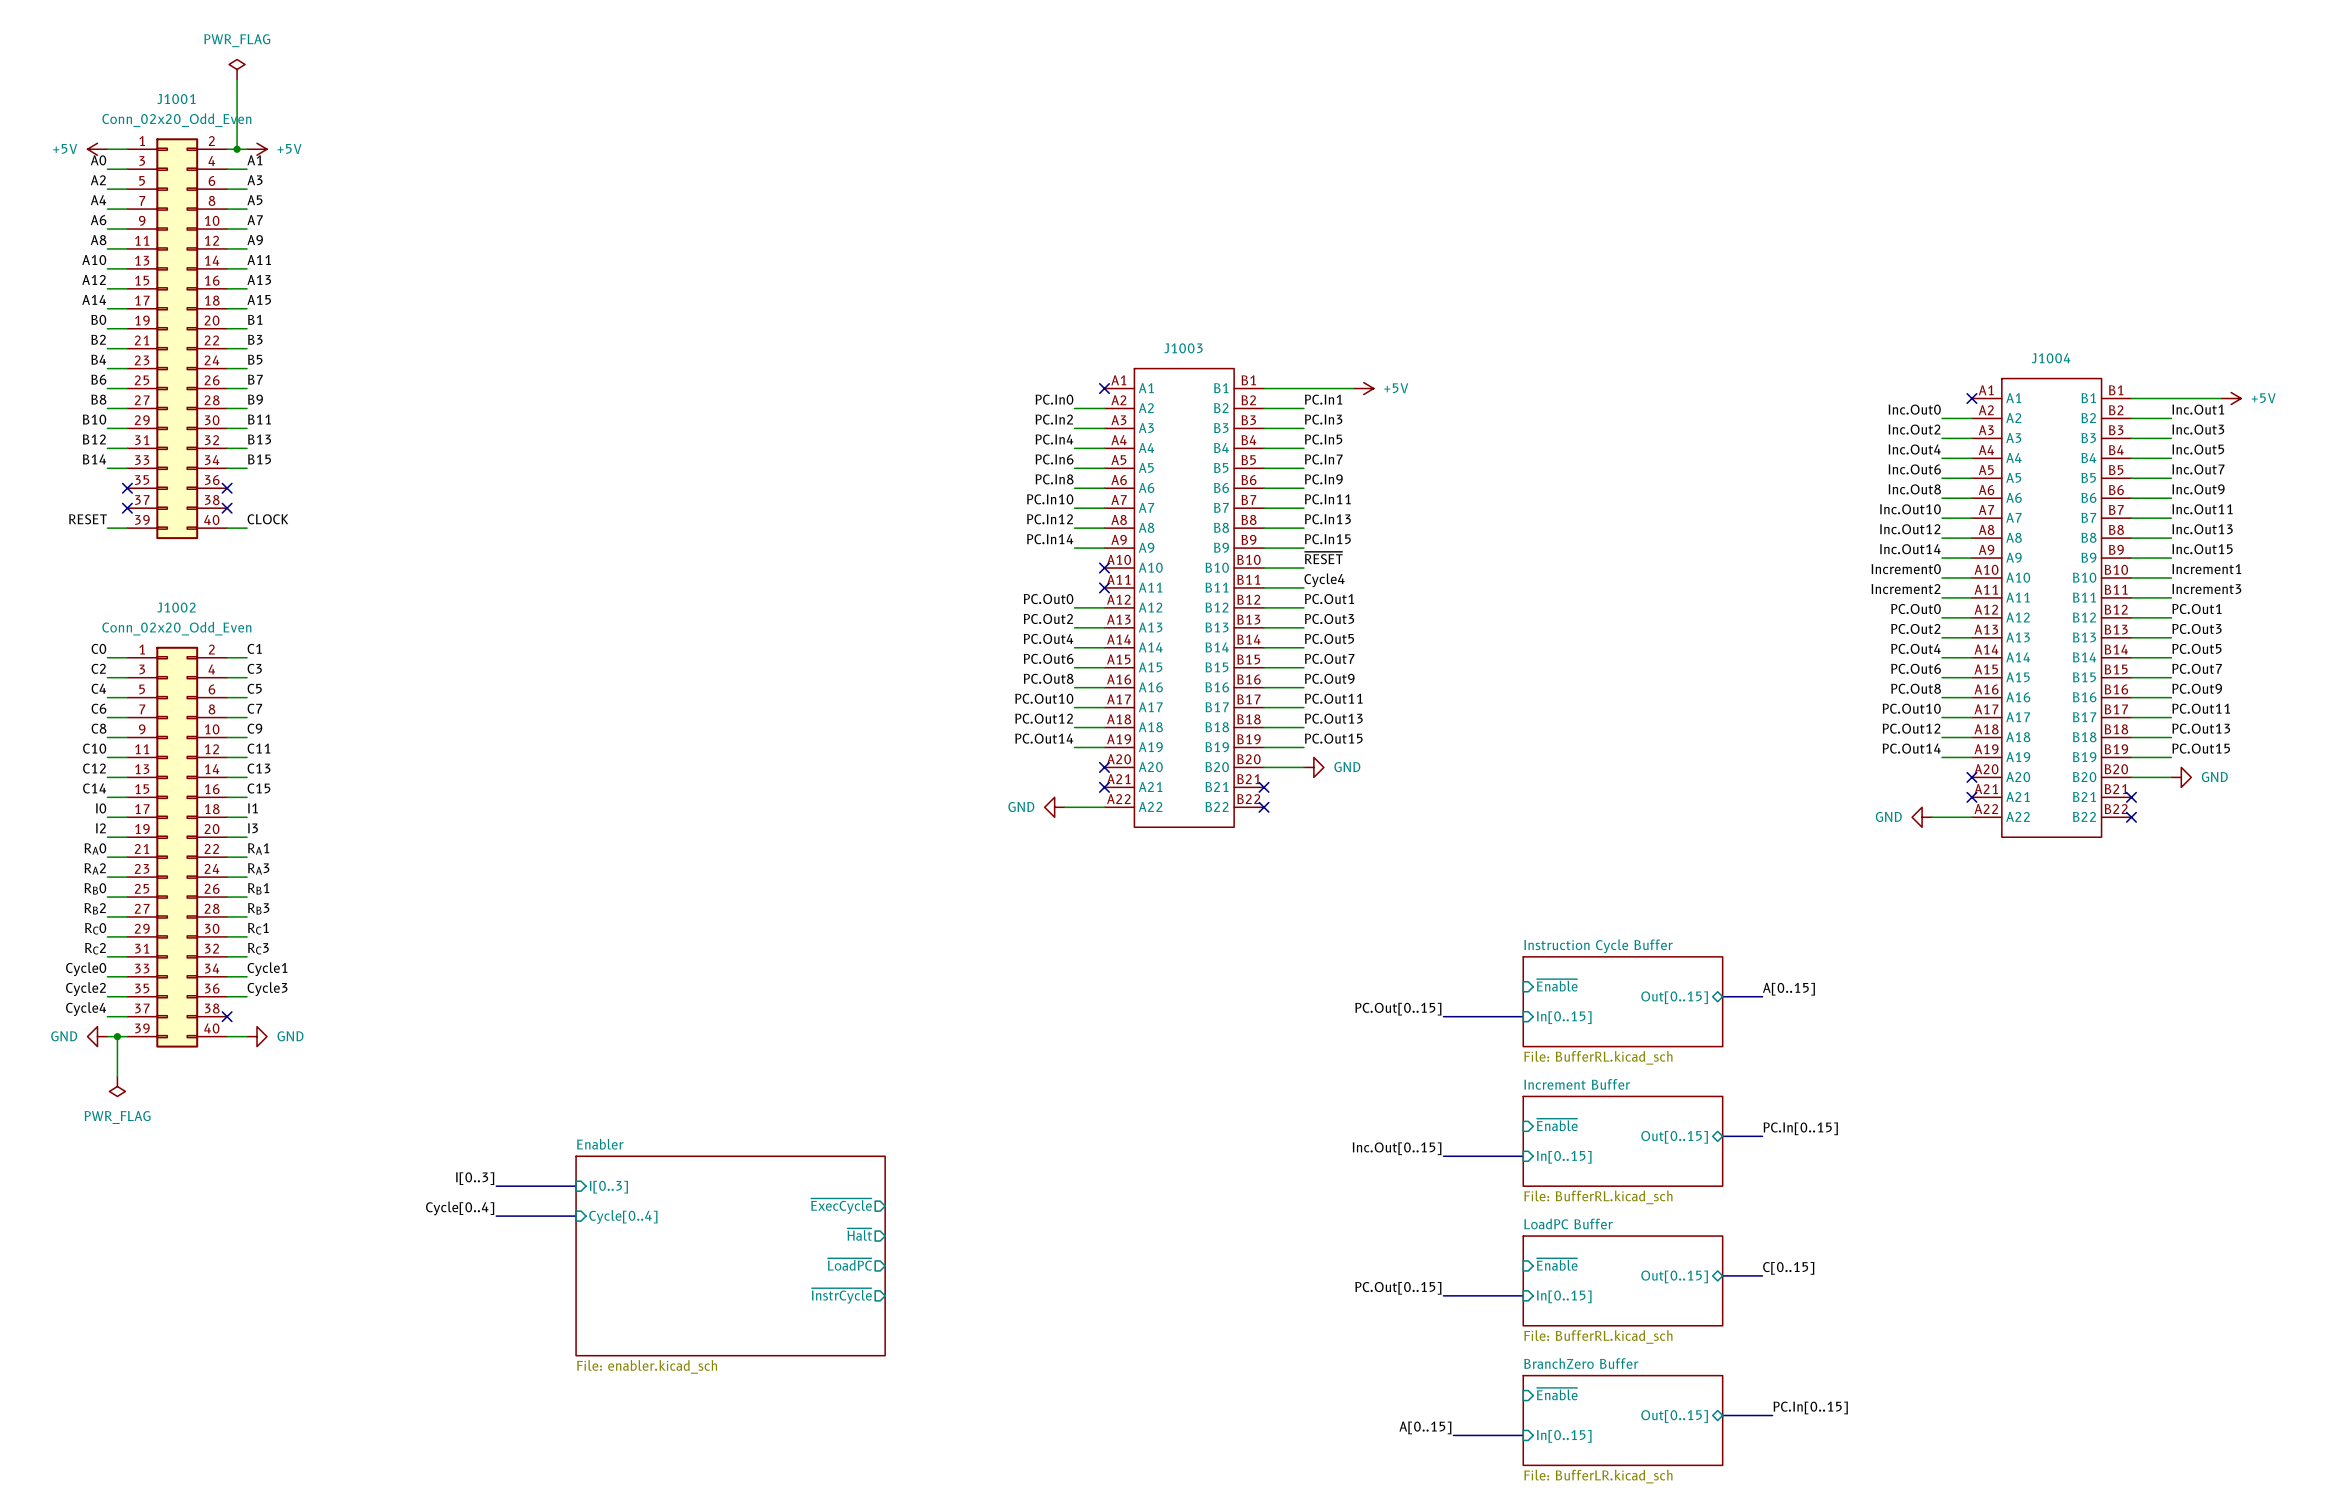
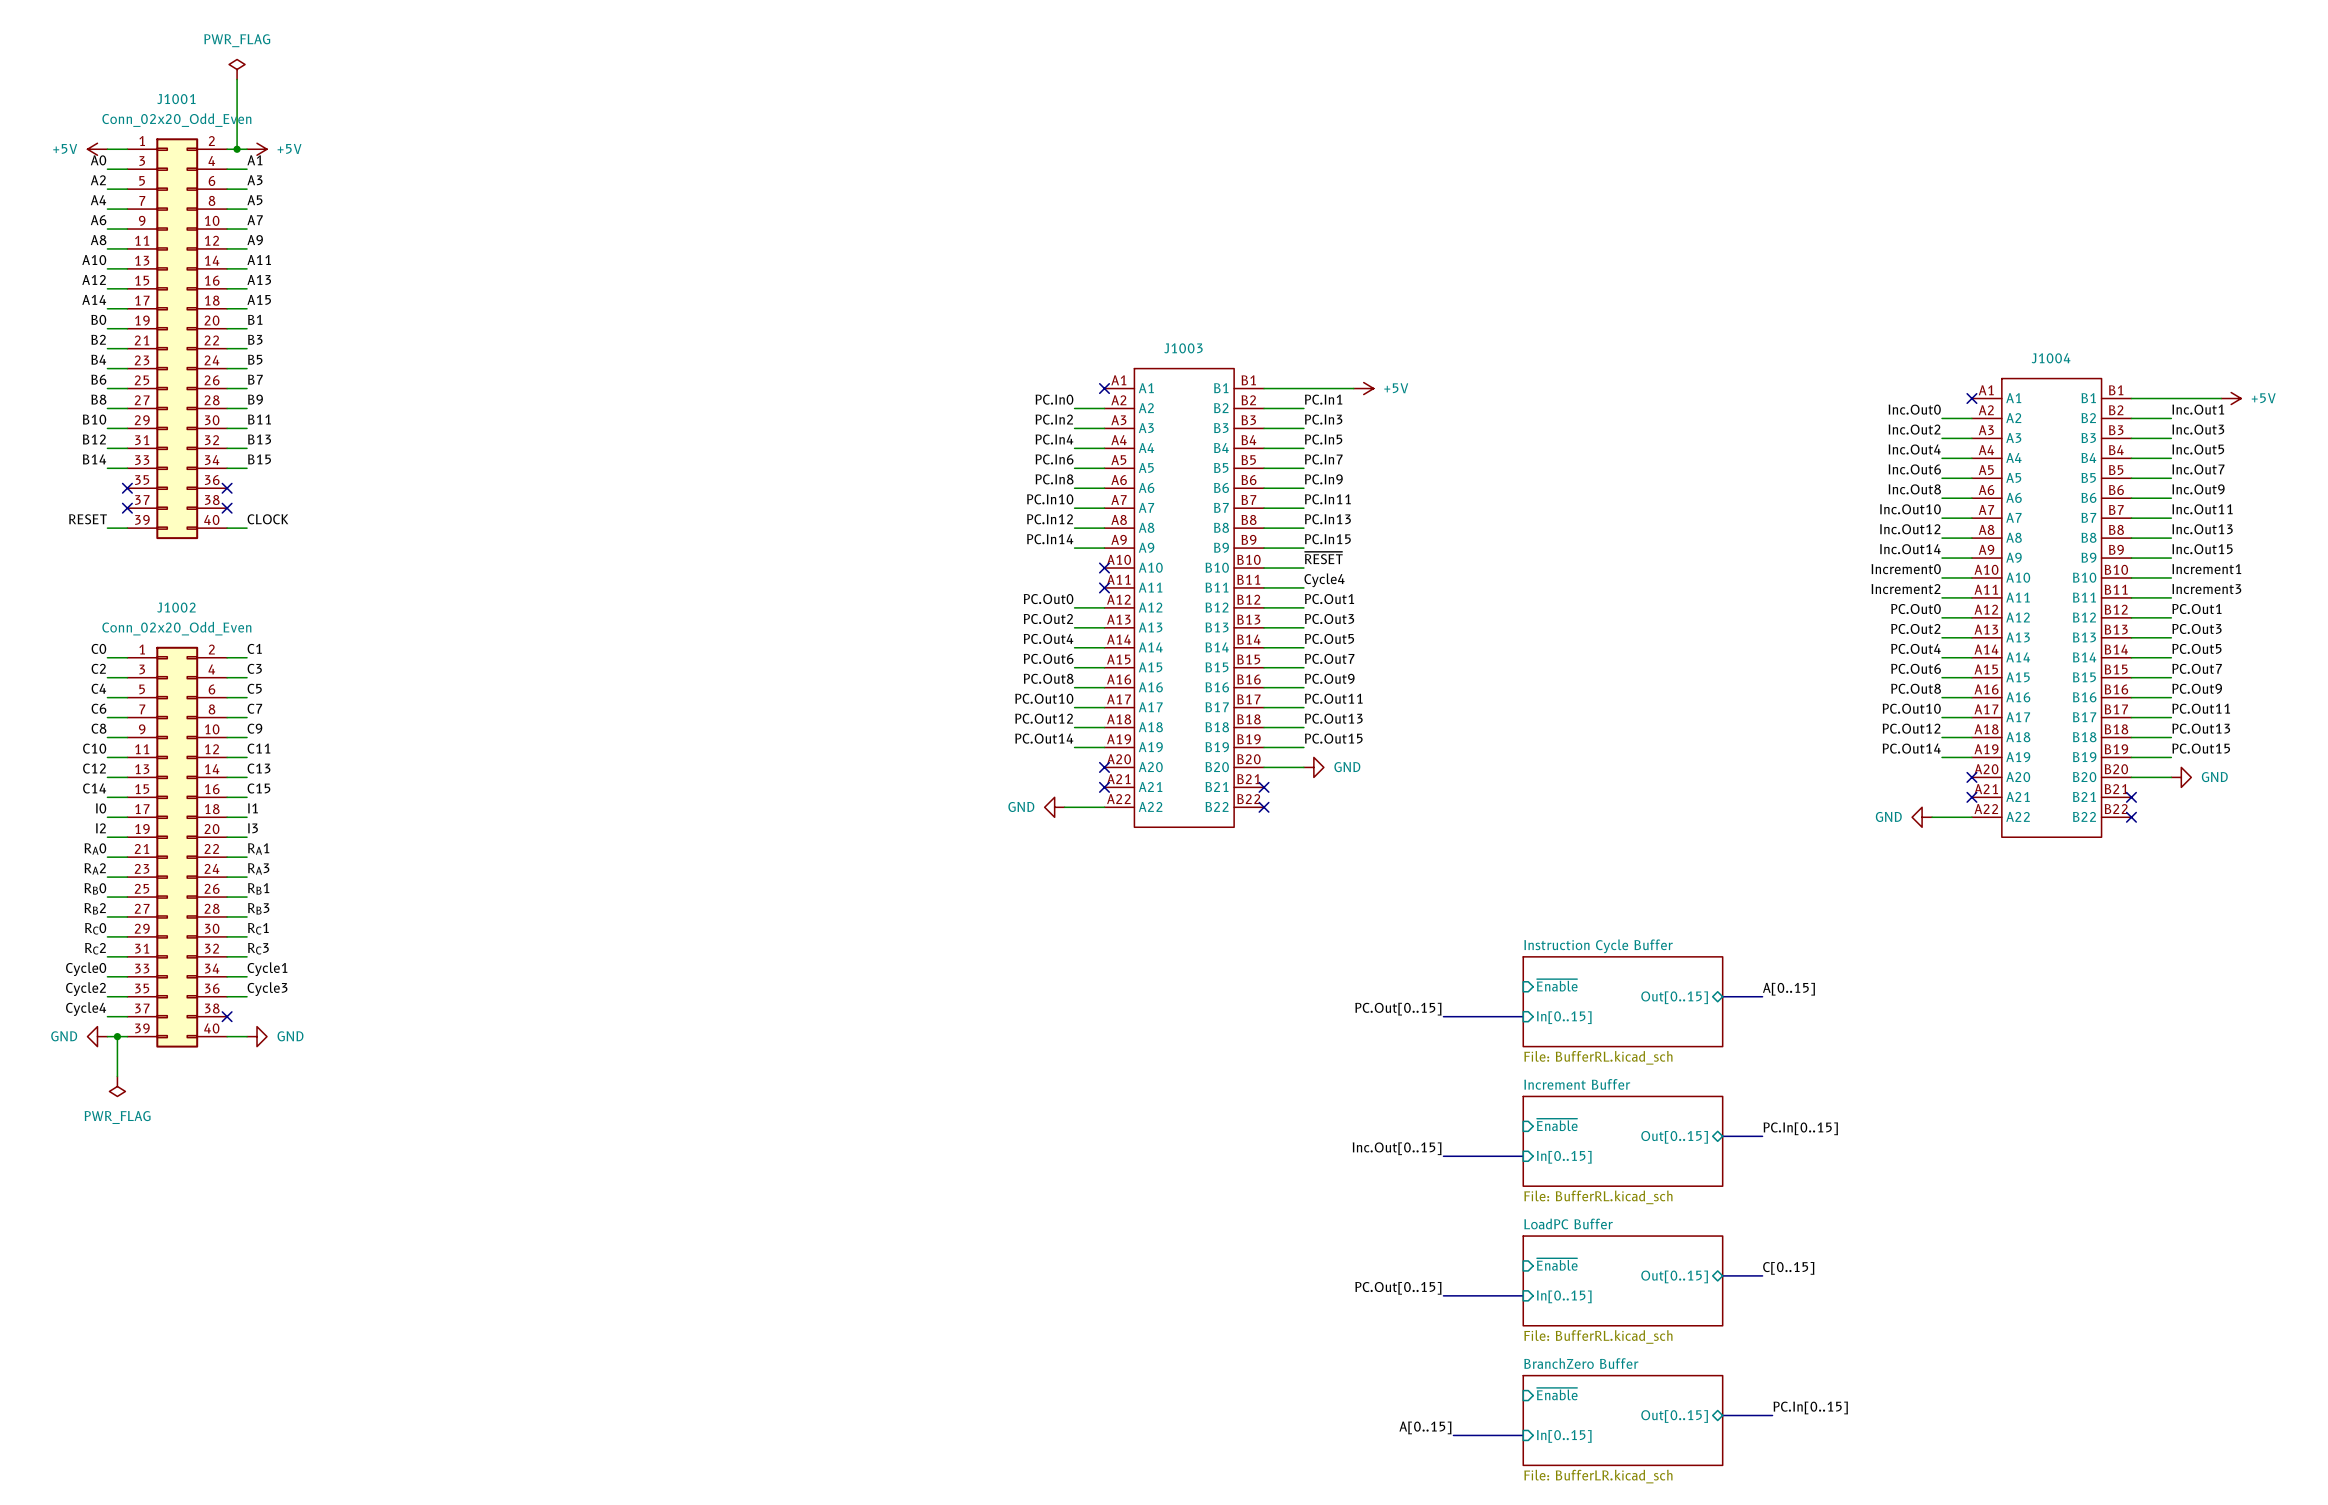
label: I[0..3] (475, 1178) -> none
bus: (496, 1186) (576, 1186) -> none
sheet pin: I[0..3] (608, 1187) -> none
sheet pin: ~{ExecCycle} (841, 1206) -> none
label: Cycle[0..4] (460, 1208) -> none
bus: (496, 1216) (576, 1216) -> none
sheet pin: Cycle[0..4] (623, 1216) -> none
sheet pin: ~{Halt} (859, 1234) -> none
sheet Enabler: File: enabler.kicad_sch (730, 1255) -> none
sheet pin: ~{LoadPC} (849, 1264) -> none
sheet pin: ~{InstrCycle} (841, 1295) -> none

